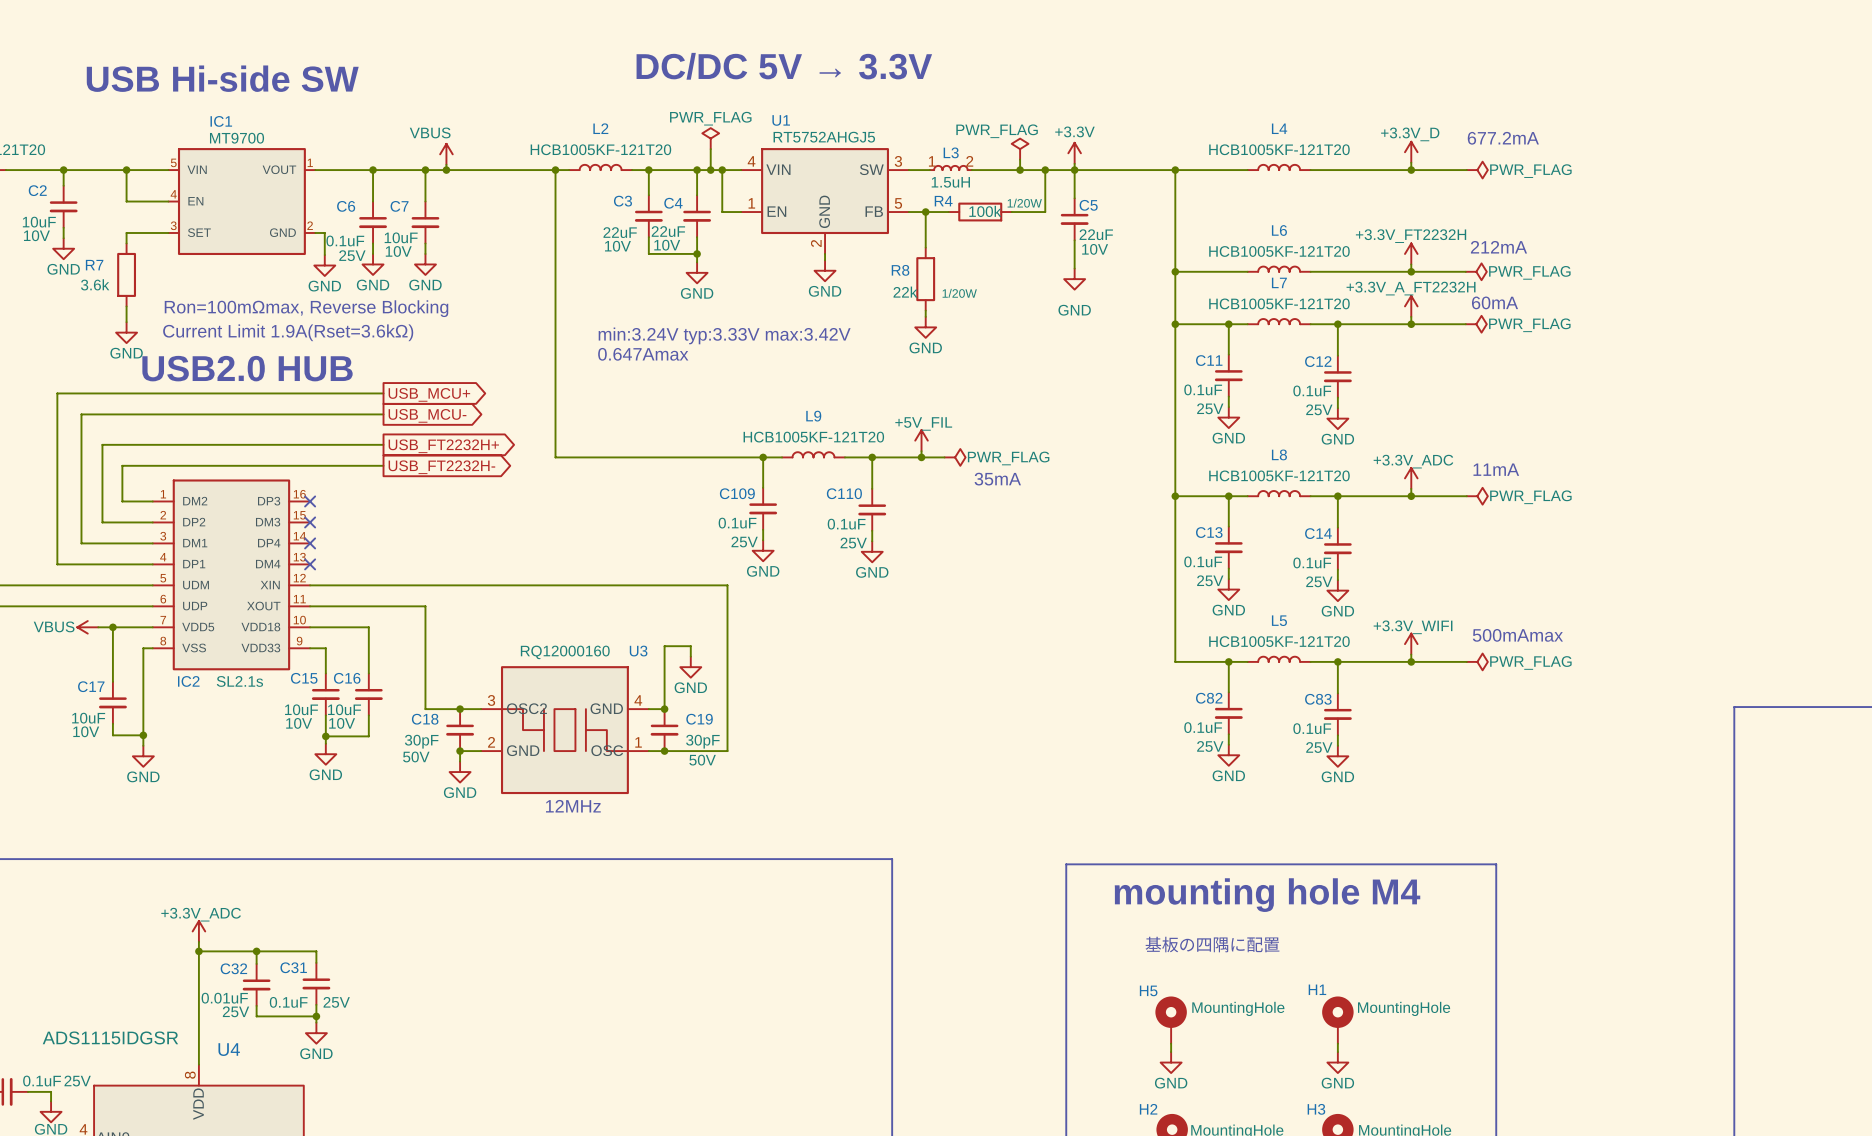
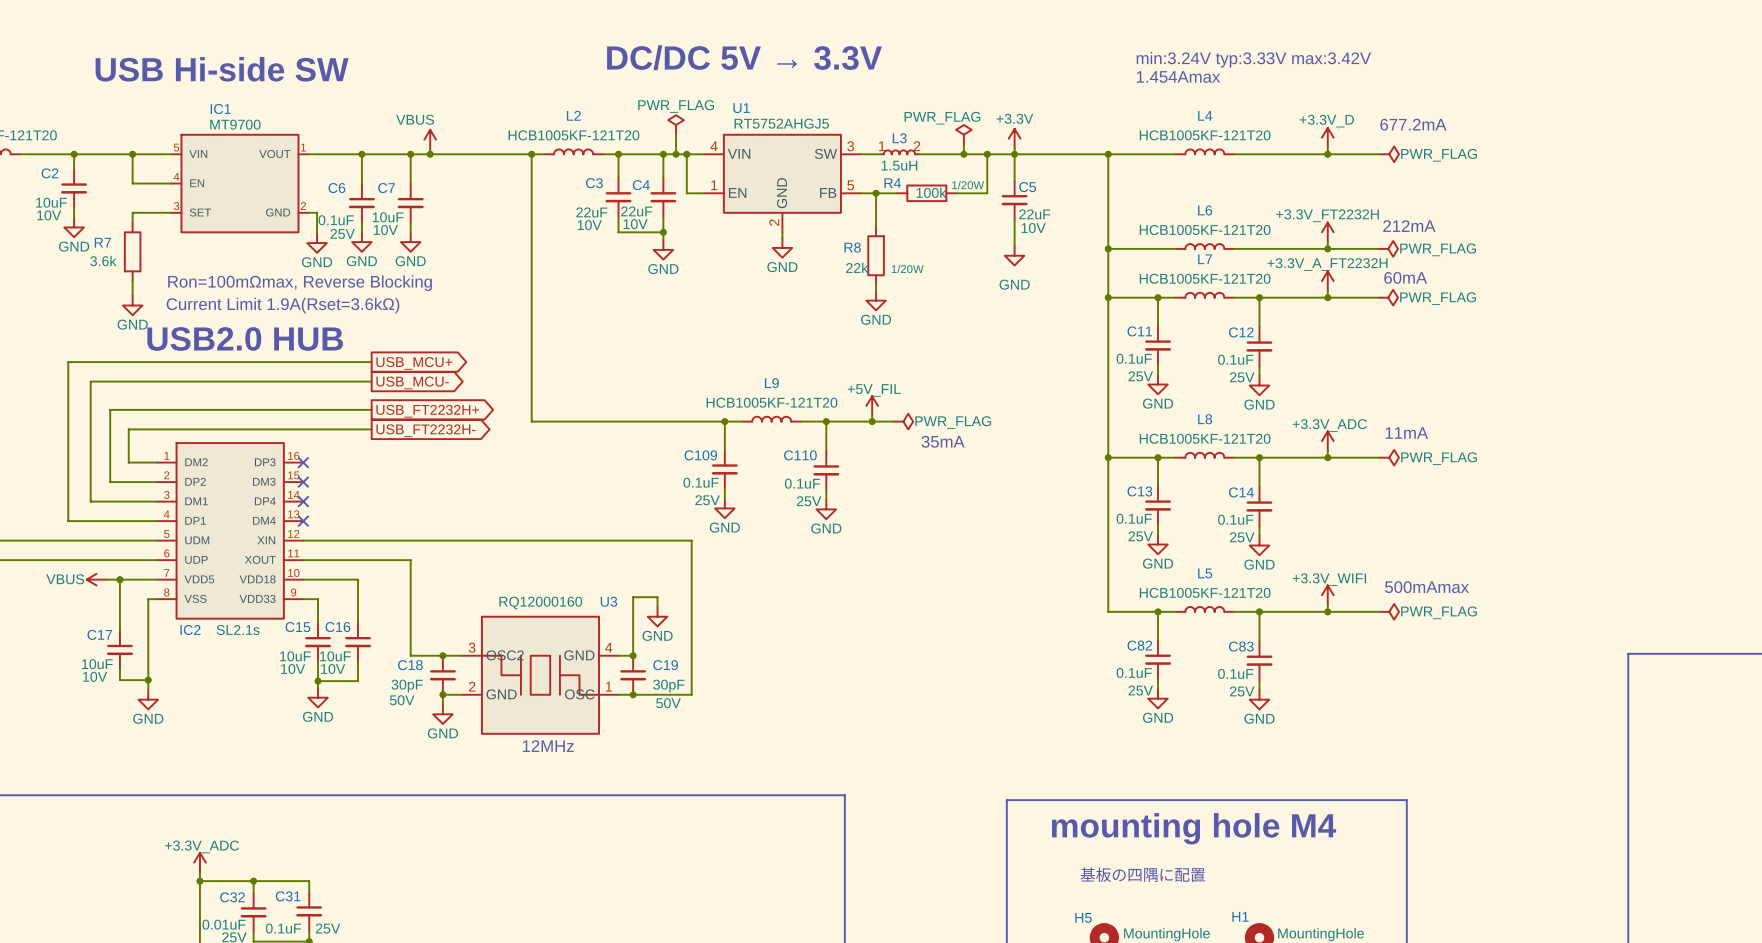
text: none -> min:3.24V typ:3.33V max:3.42V (1253, 59)
text: none -> 1.454Amax (1178, 76)
text: min:3.24V typ:3.33V max:3.42V (724, 335) -> none
text: 0.647Amax (643, 354) -> none

